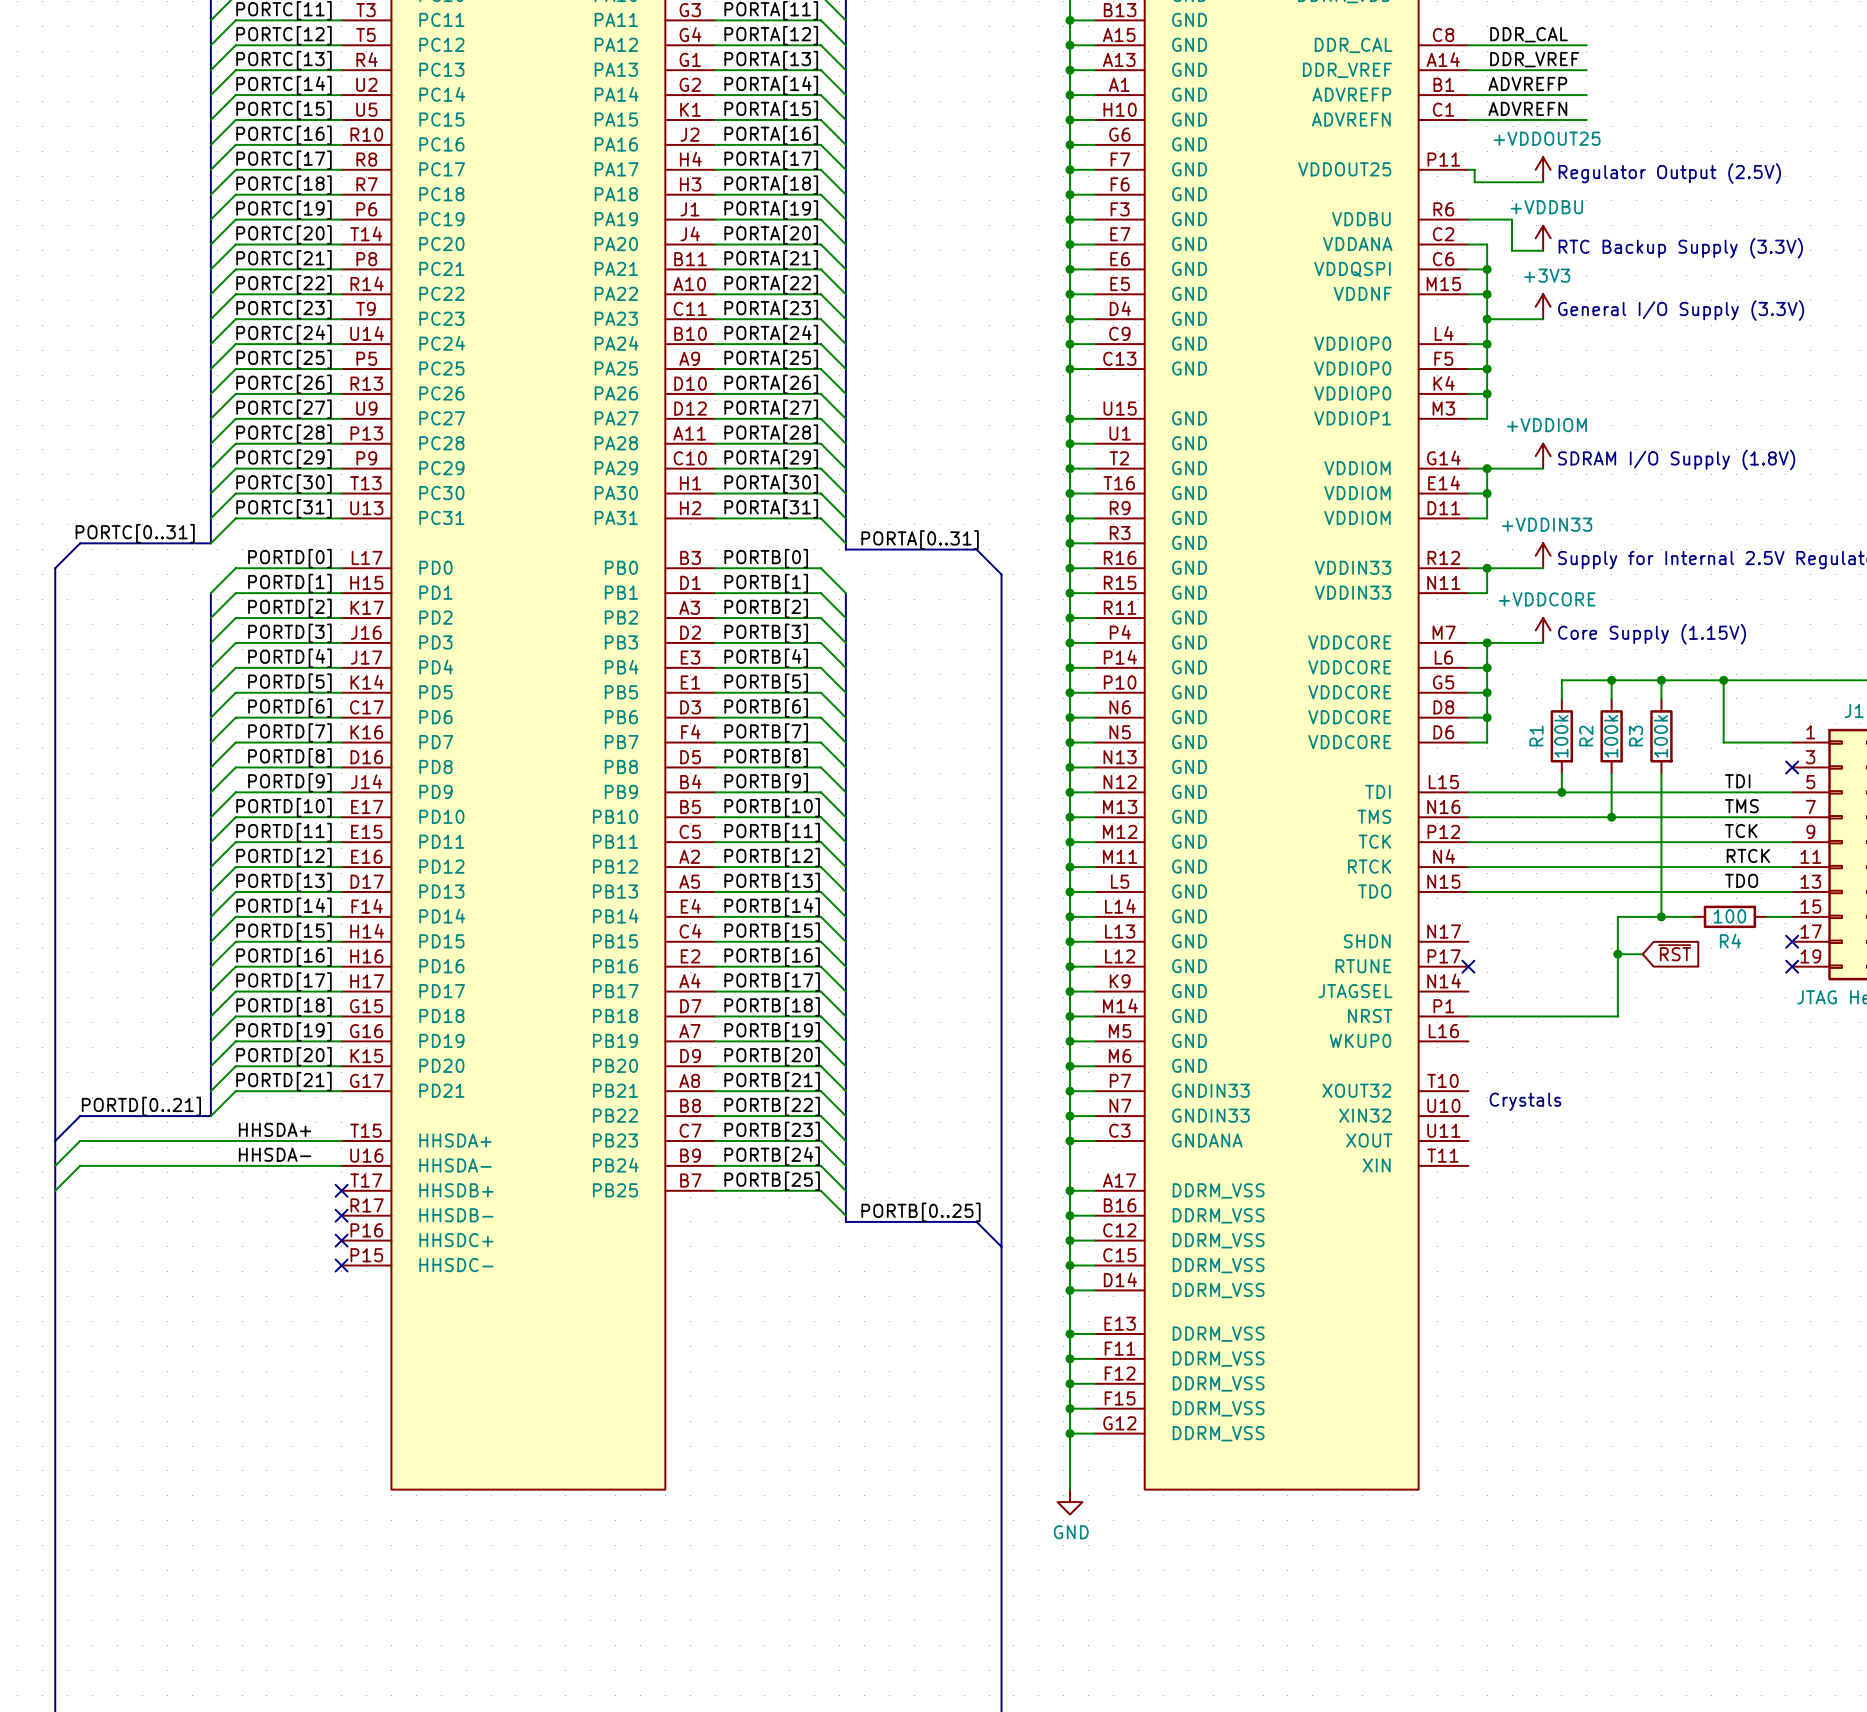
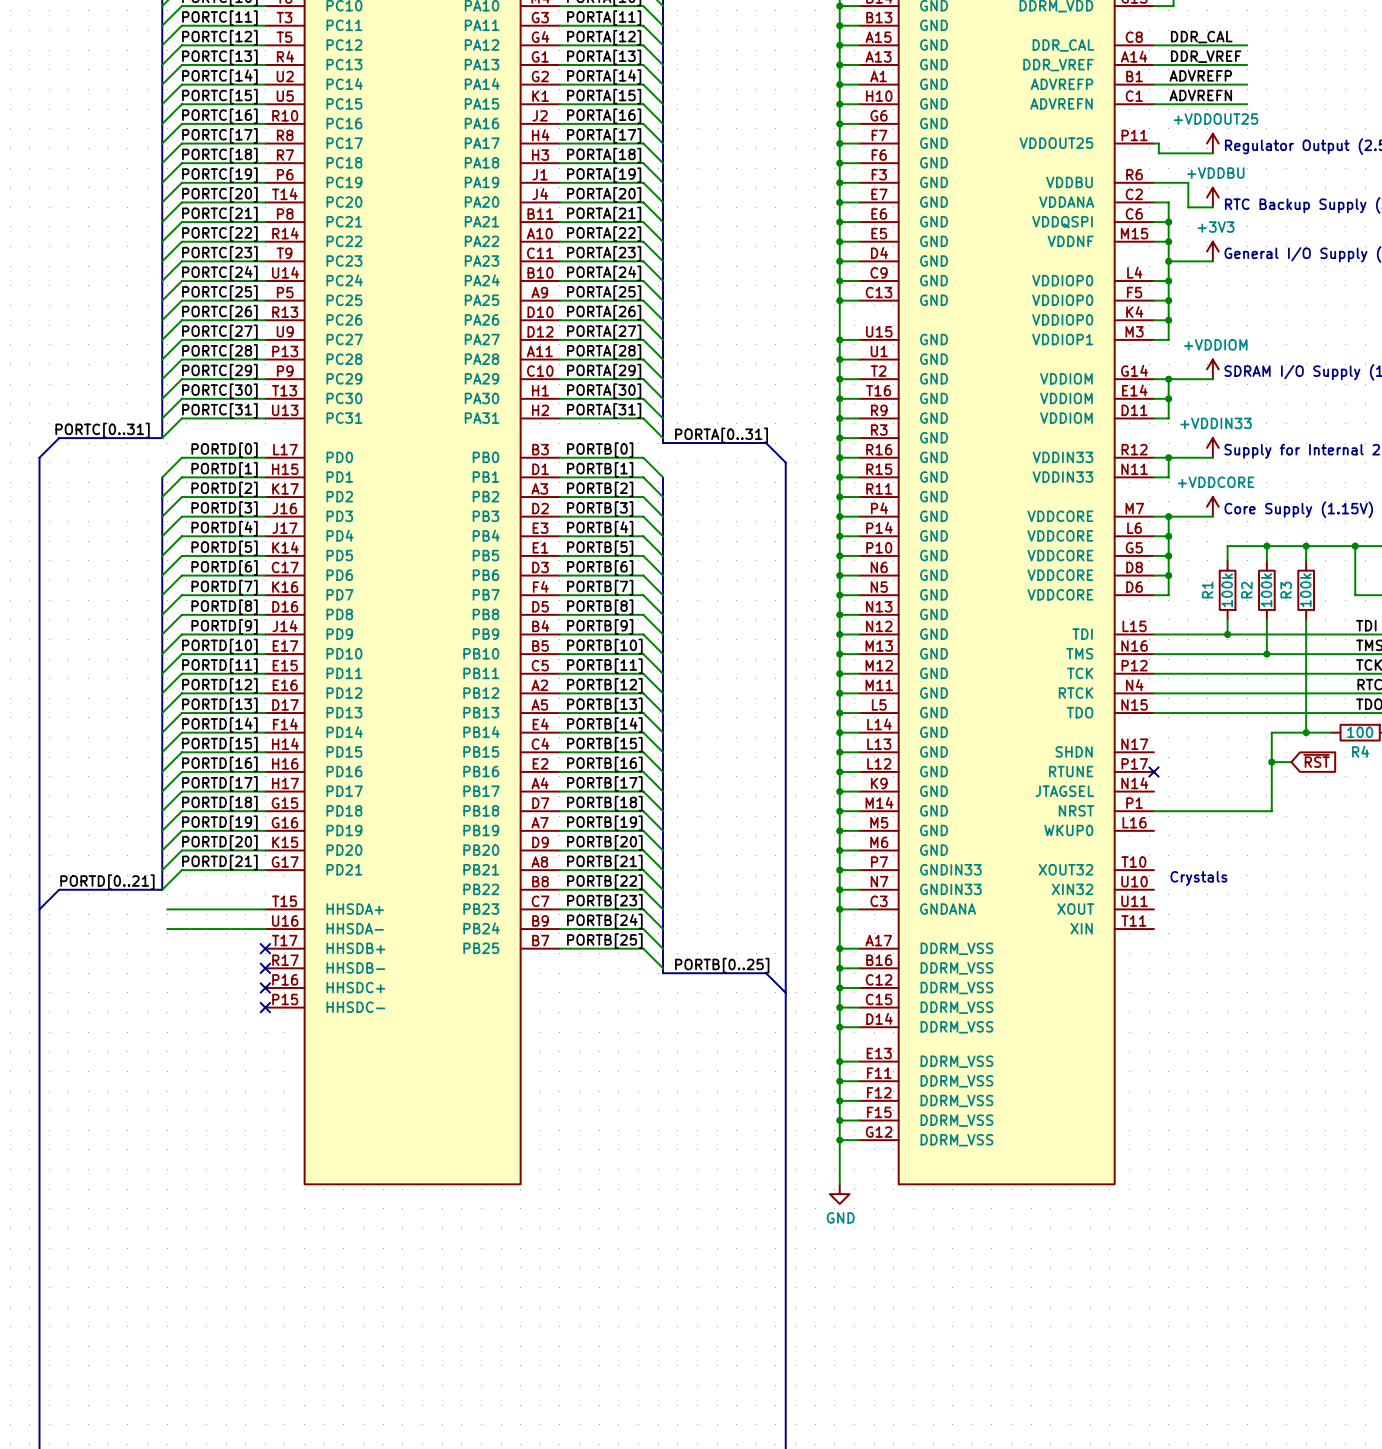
label: HHSDA+ (275, 1129) -> none
wire: (217, 1140) (80, 1140) (55, 1165) -> none
label: HHSDA- (275, 1154) -> none
wire: (217, 1165) (80, 1165) (55, 1190) -> none

